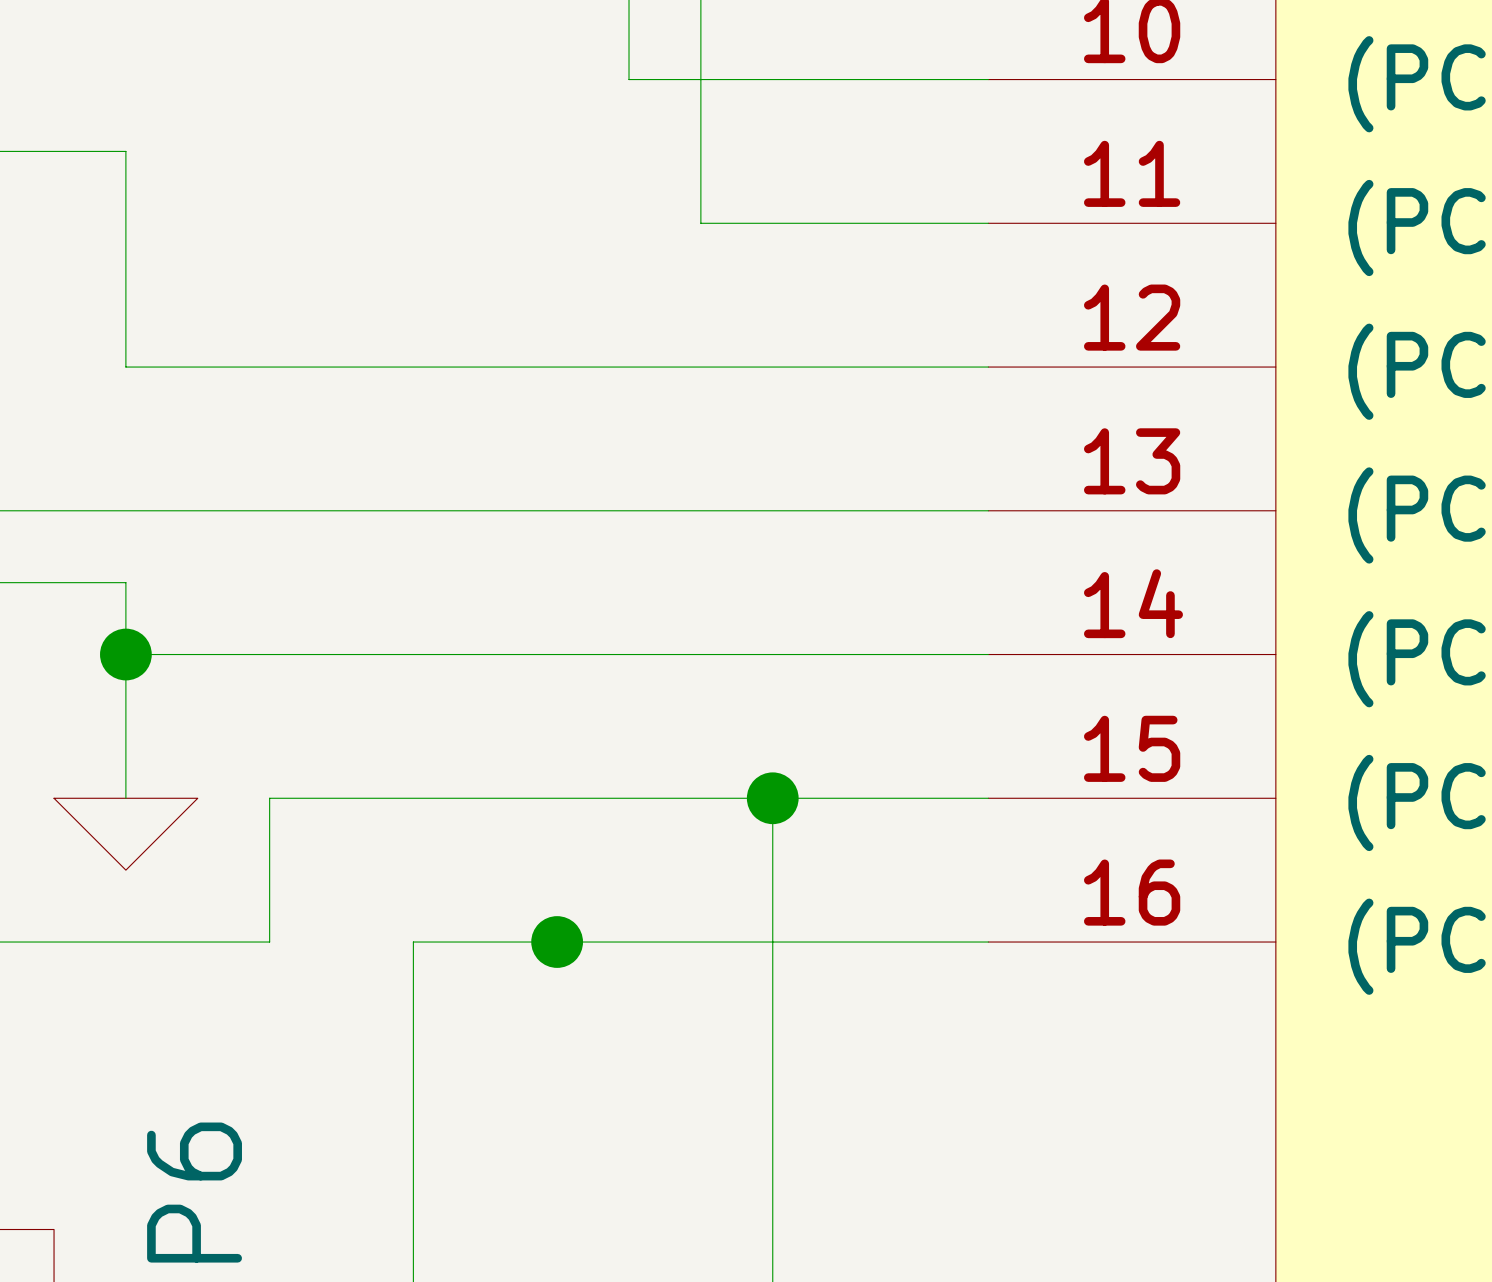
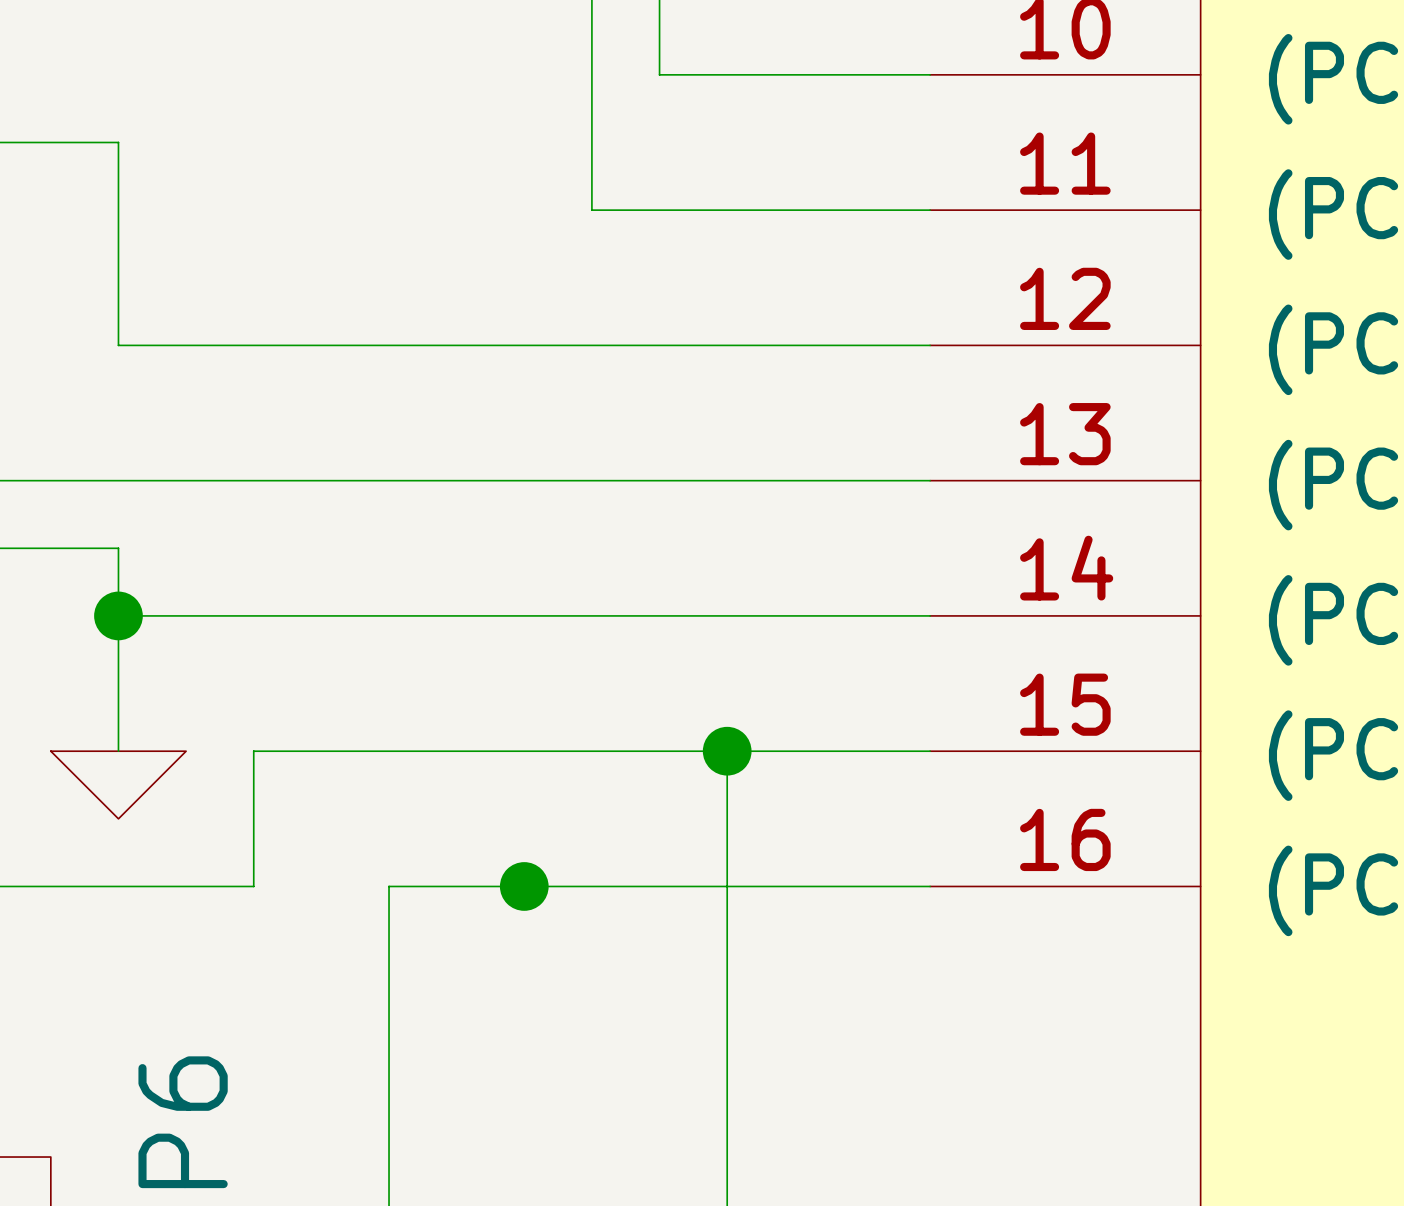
wire: (629, 79) (700, 79) (700, 223) -> (591, 74) (591, 210) (659, 210)

